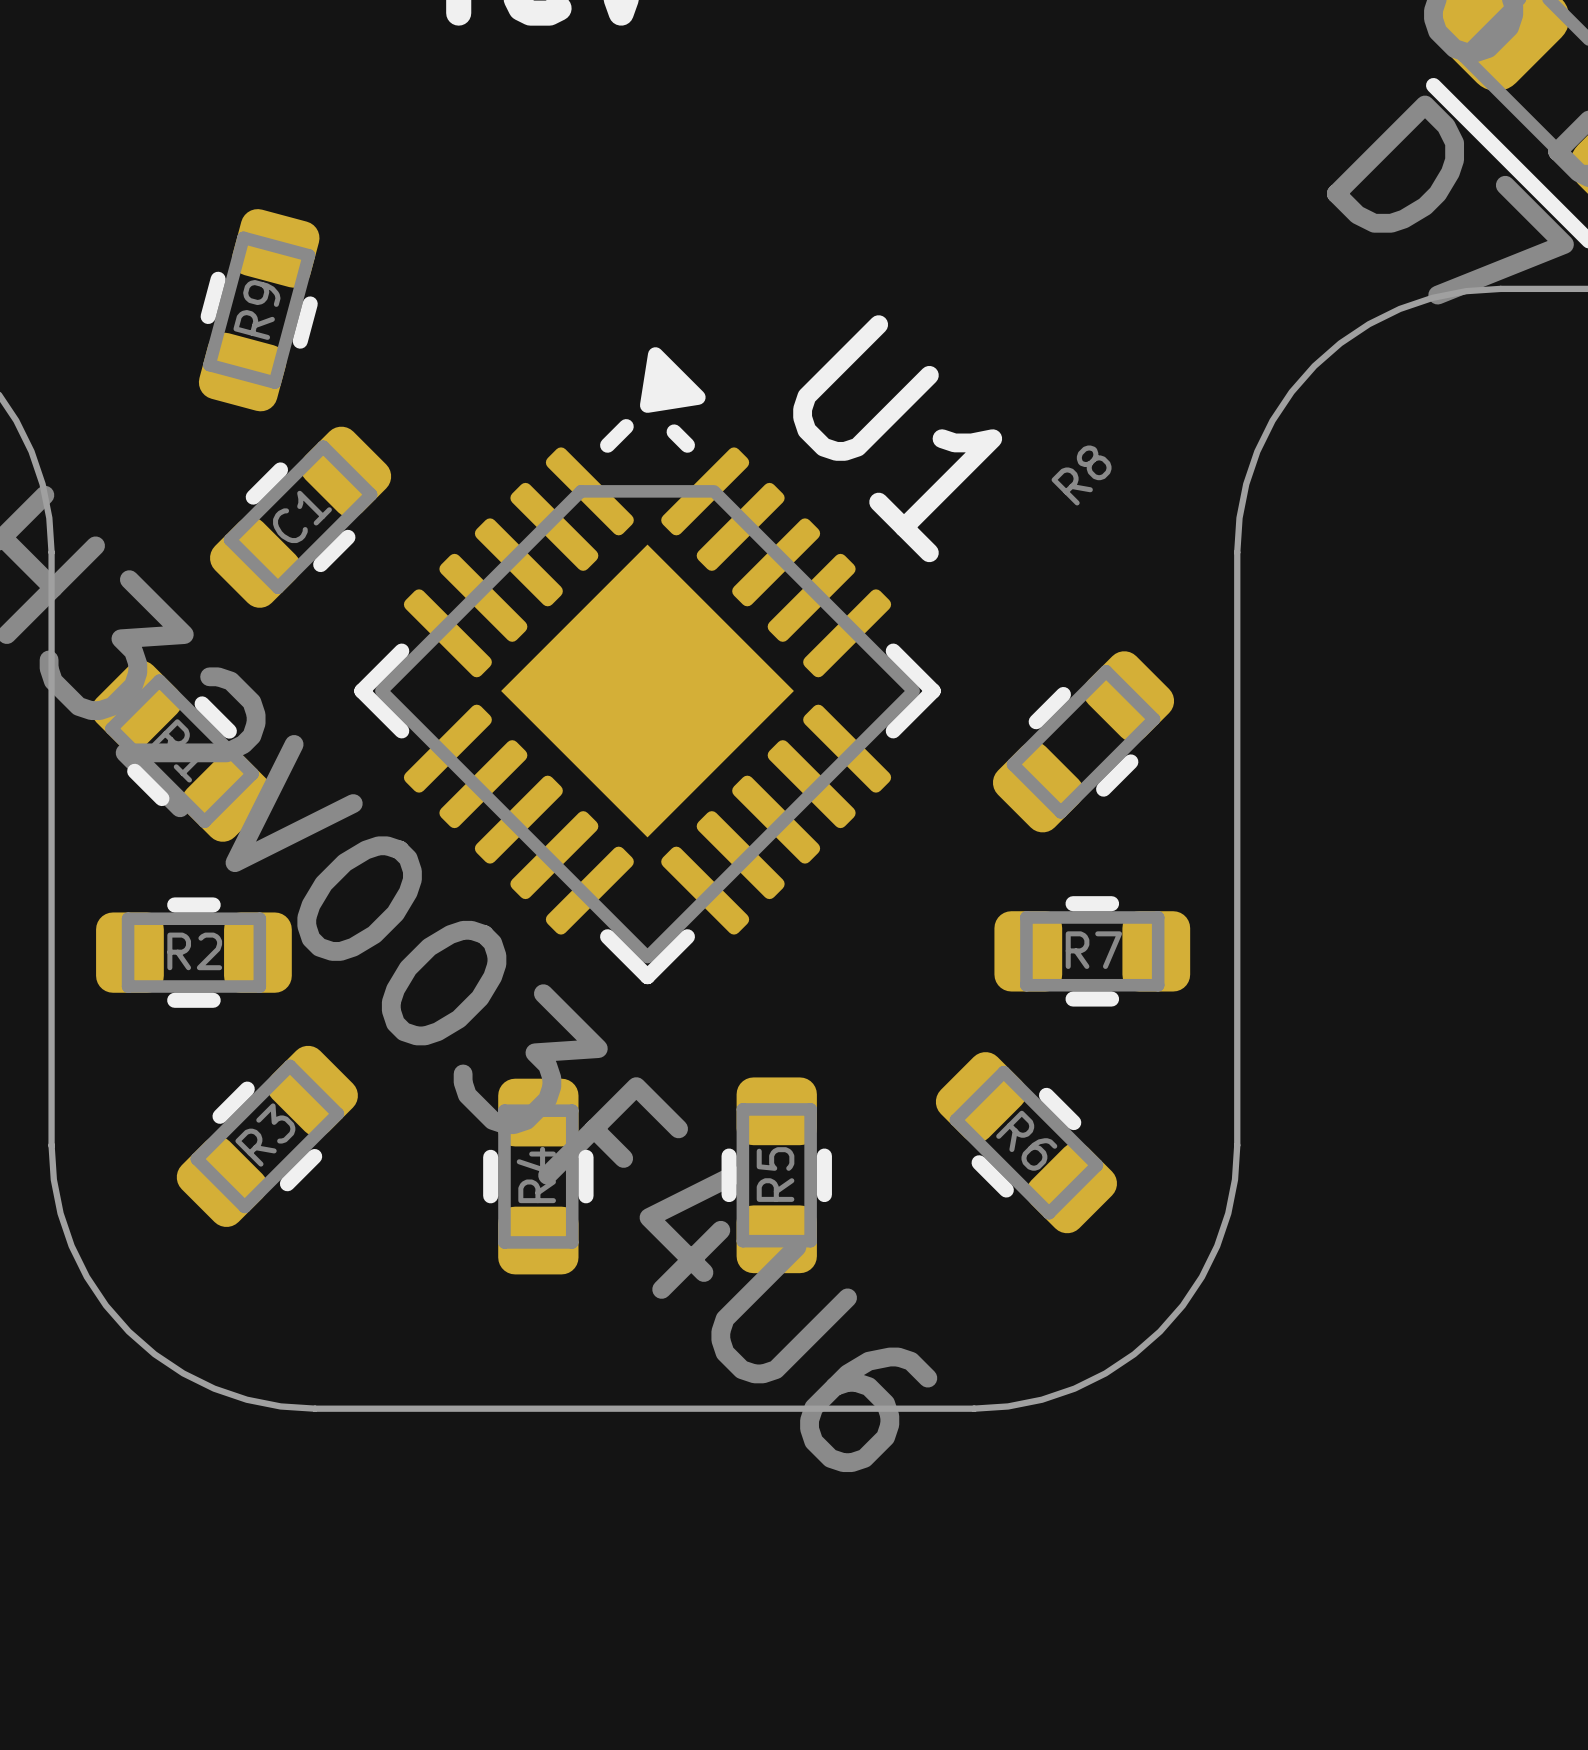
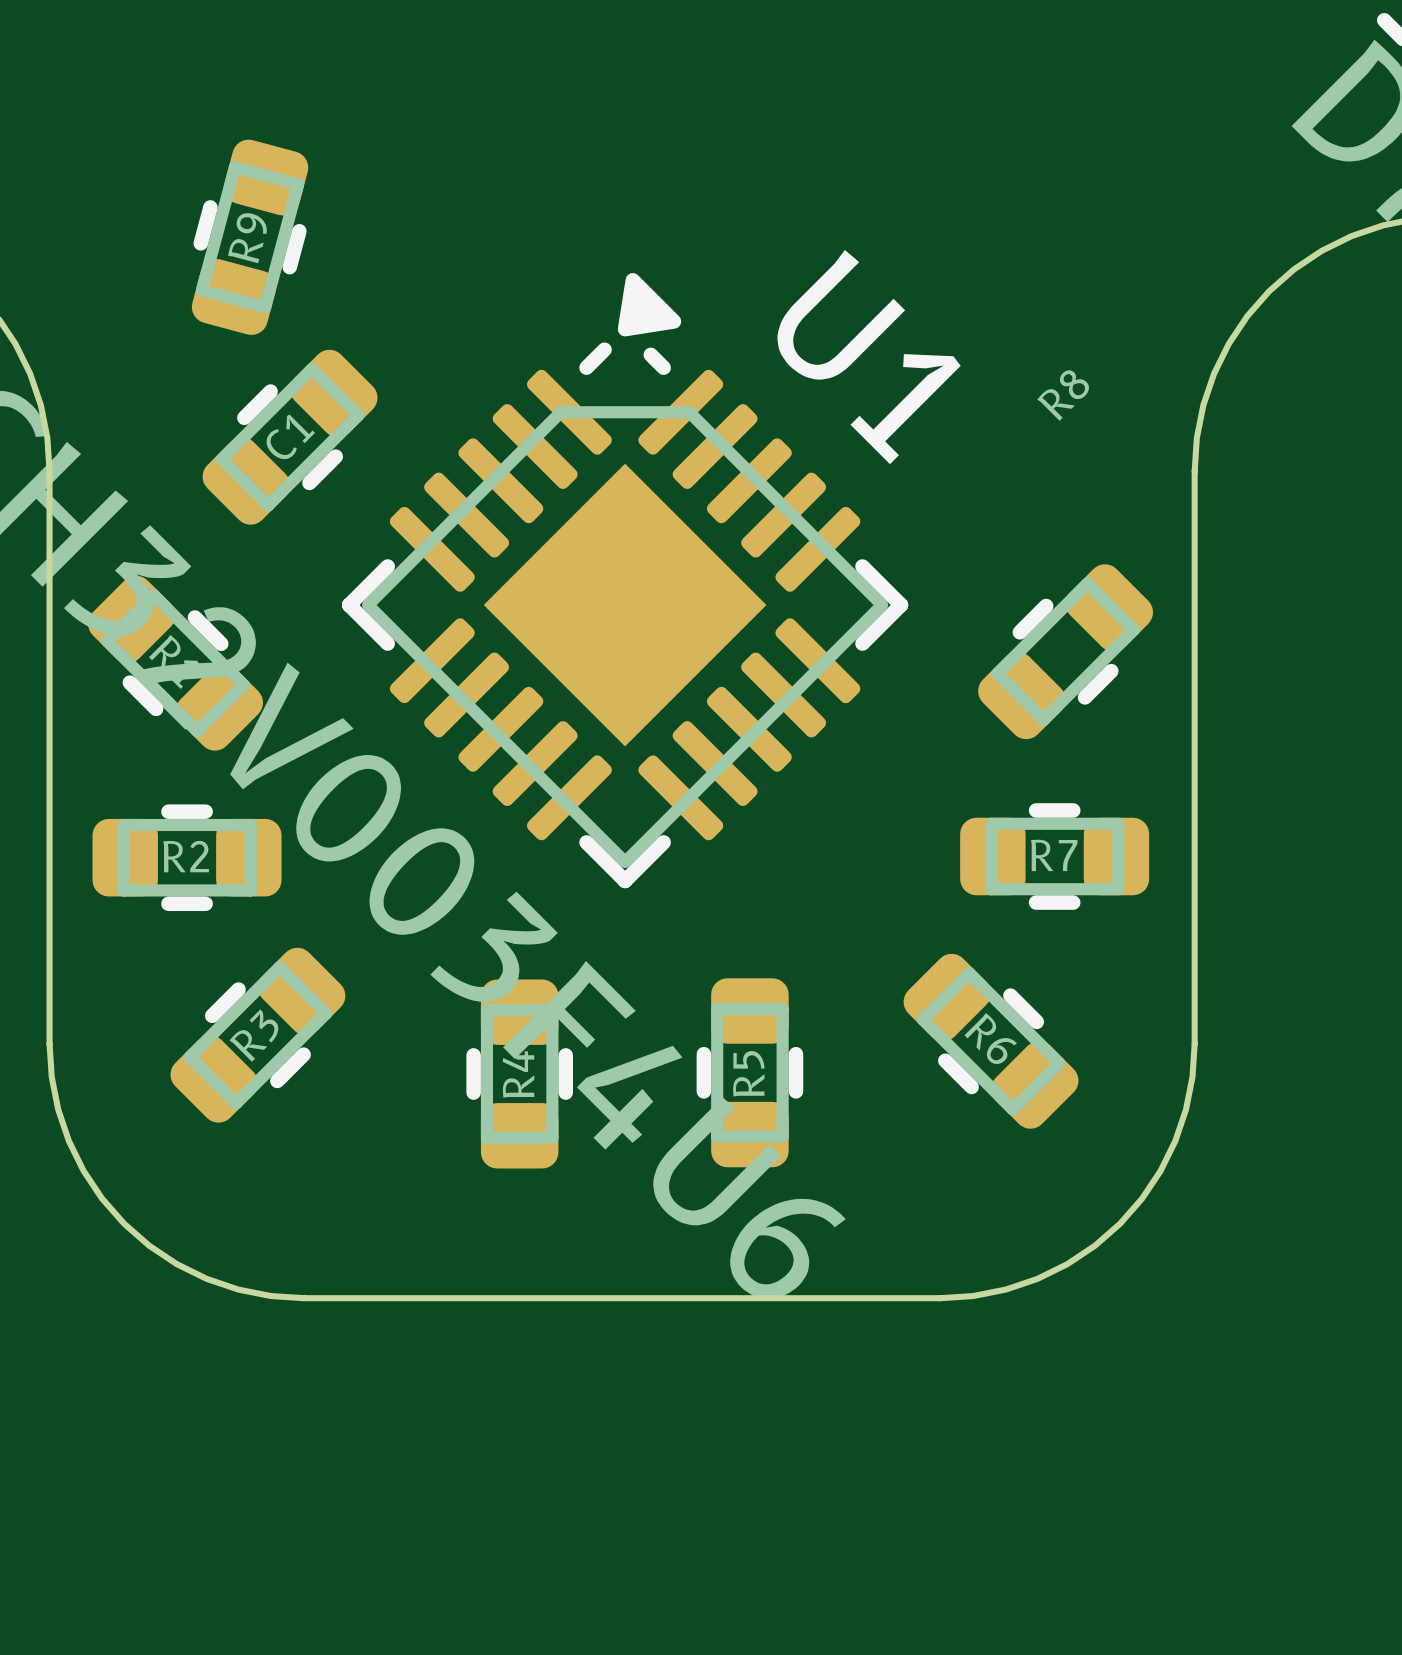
R8 position: (1083, 741) -> (1065, 651)

